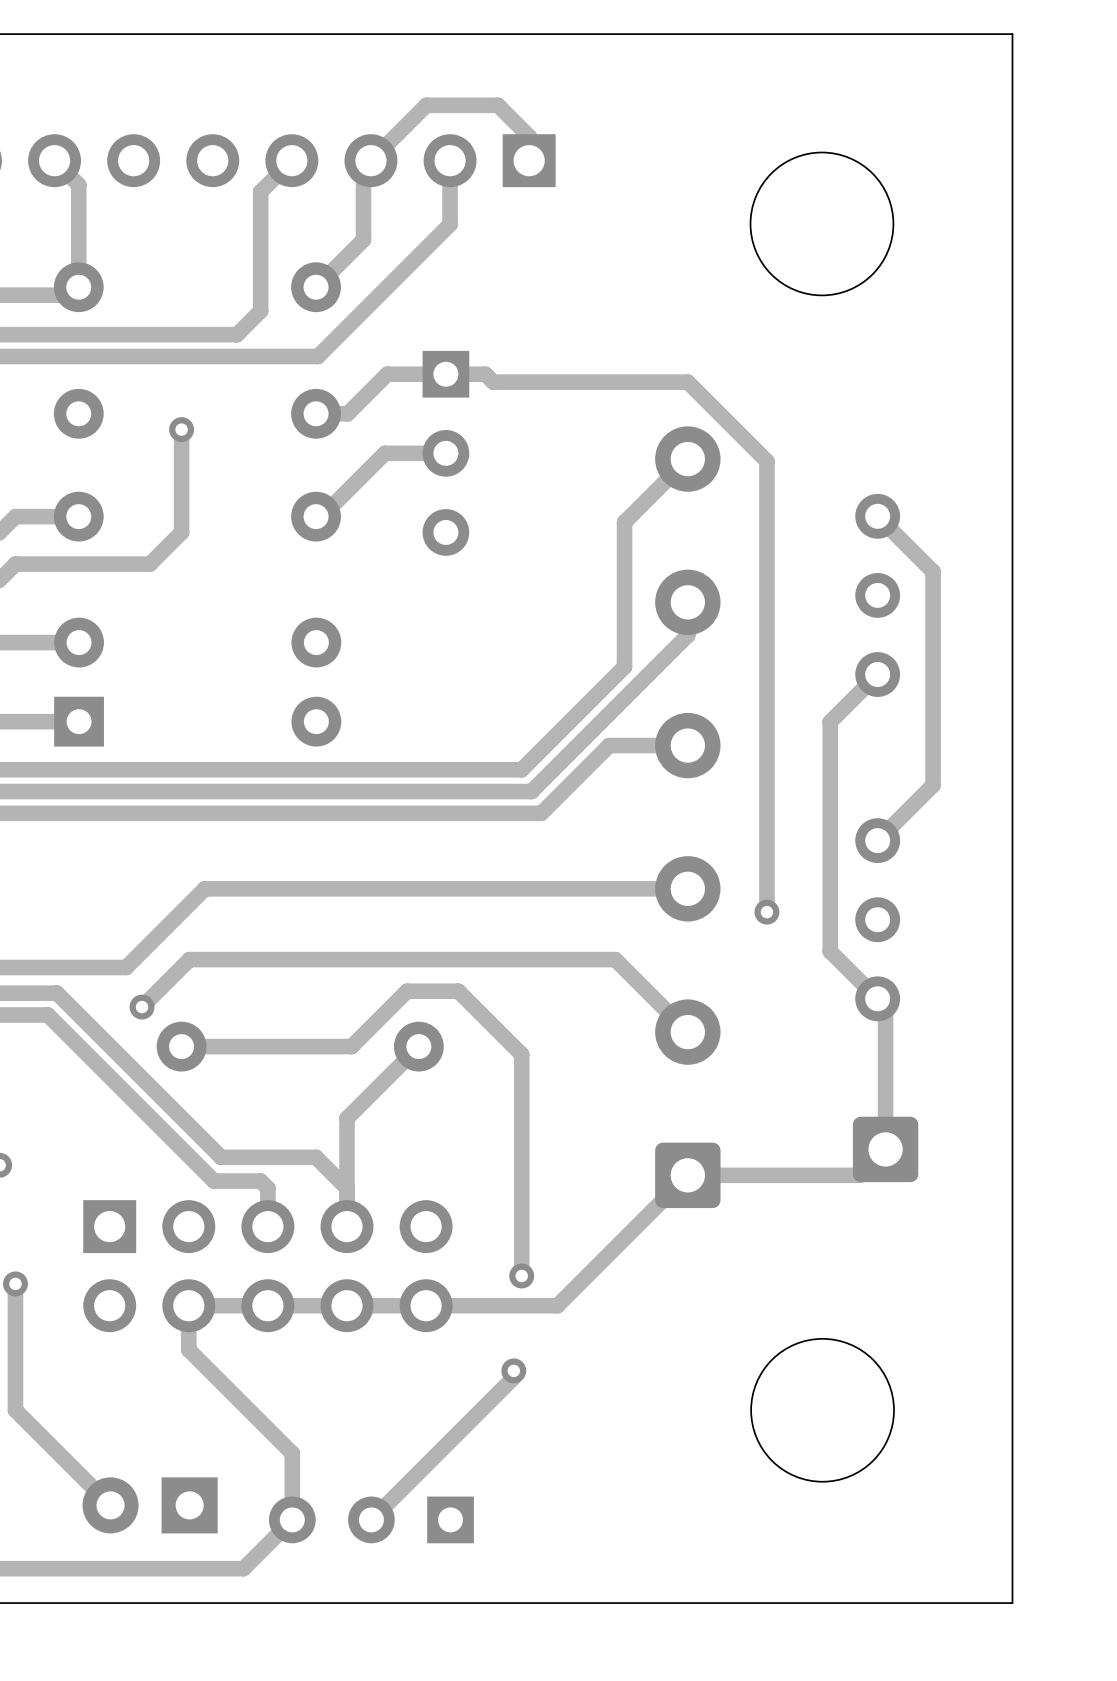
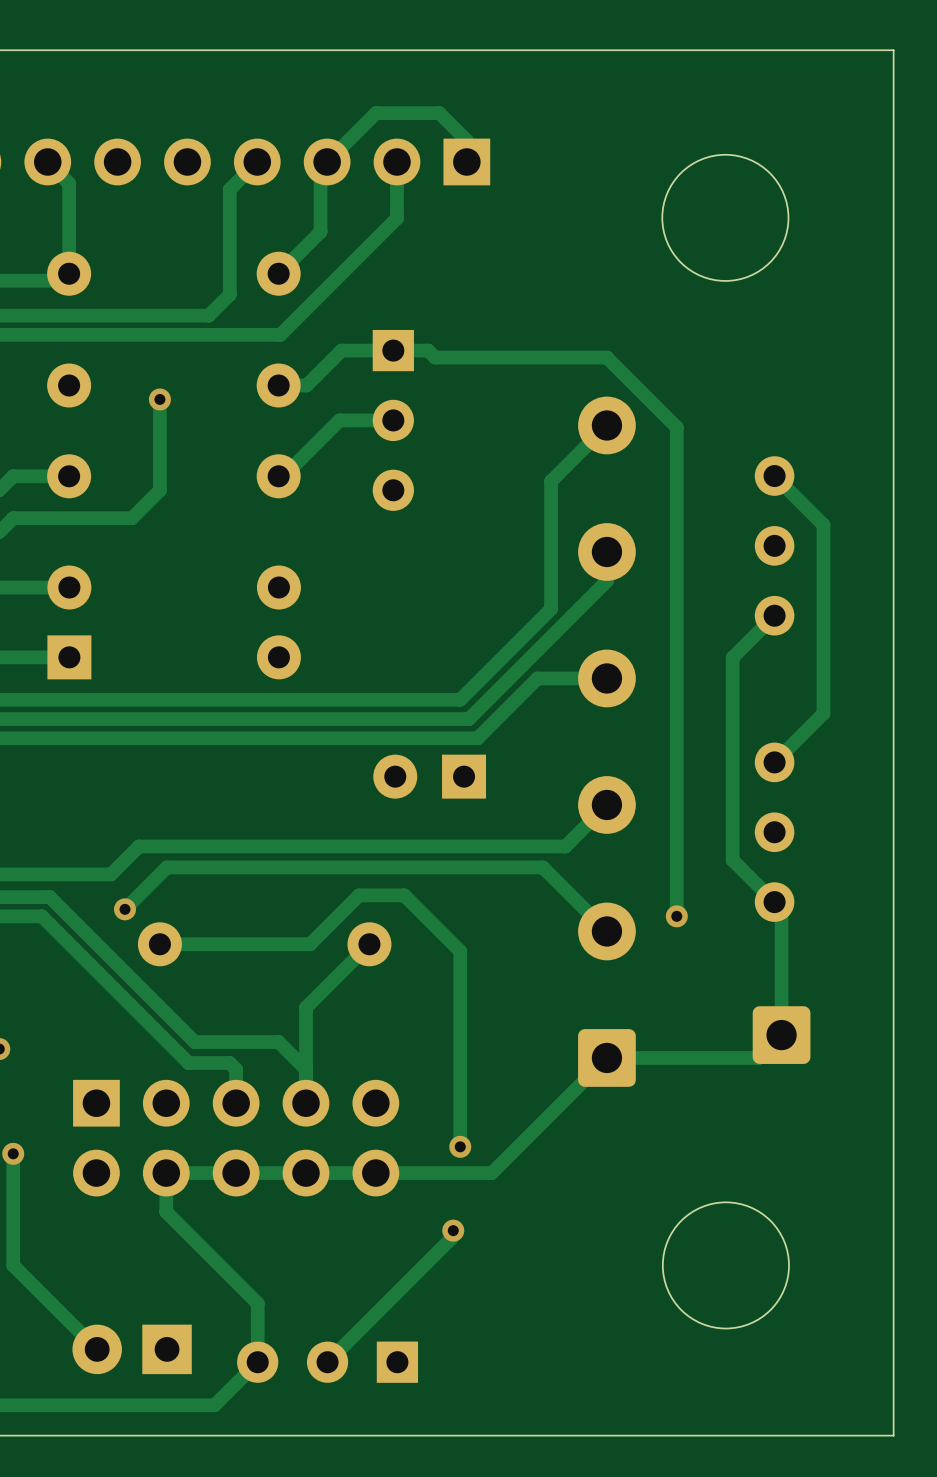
part: none -> (429, 776)
track: (687, 888) (204, 888) (157, 935) -> (606, 804) (565, 846) (138, 846)
track: none -> (676, 825) (676, 916)
via position: (766, 912) -> (676, 916)

